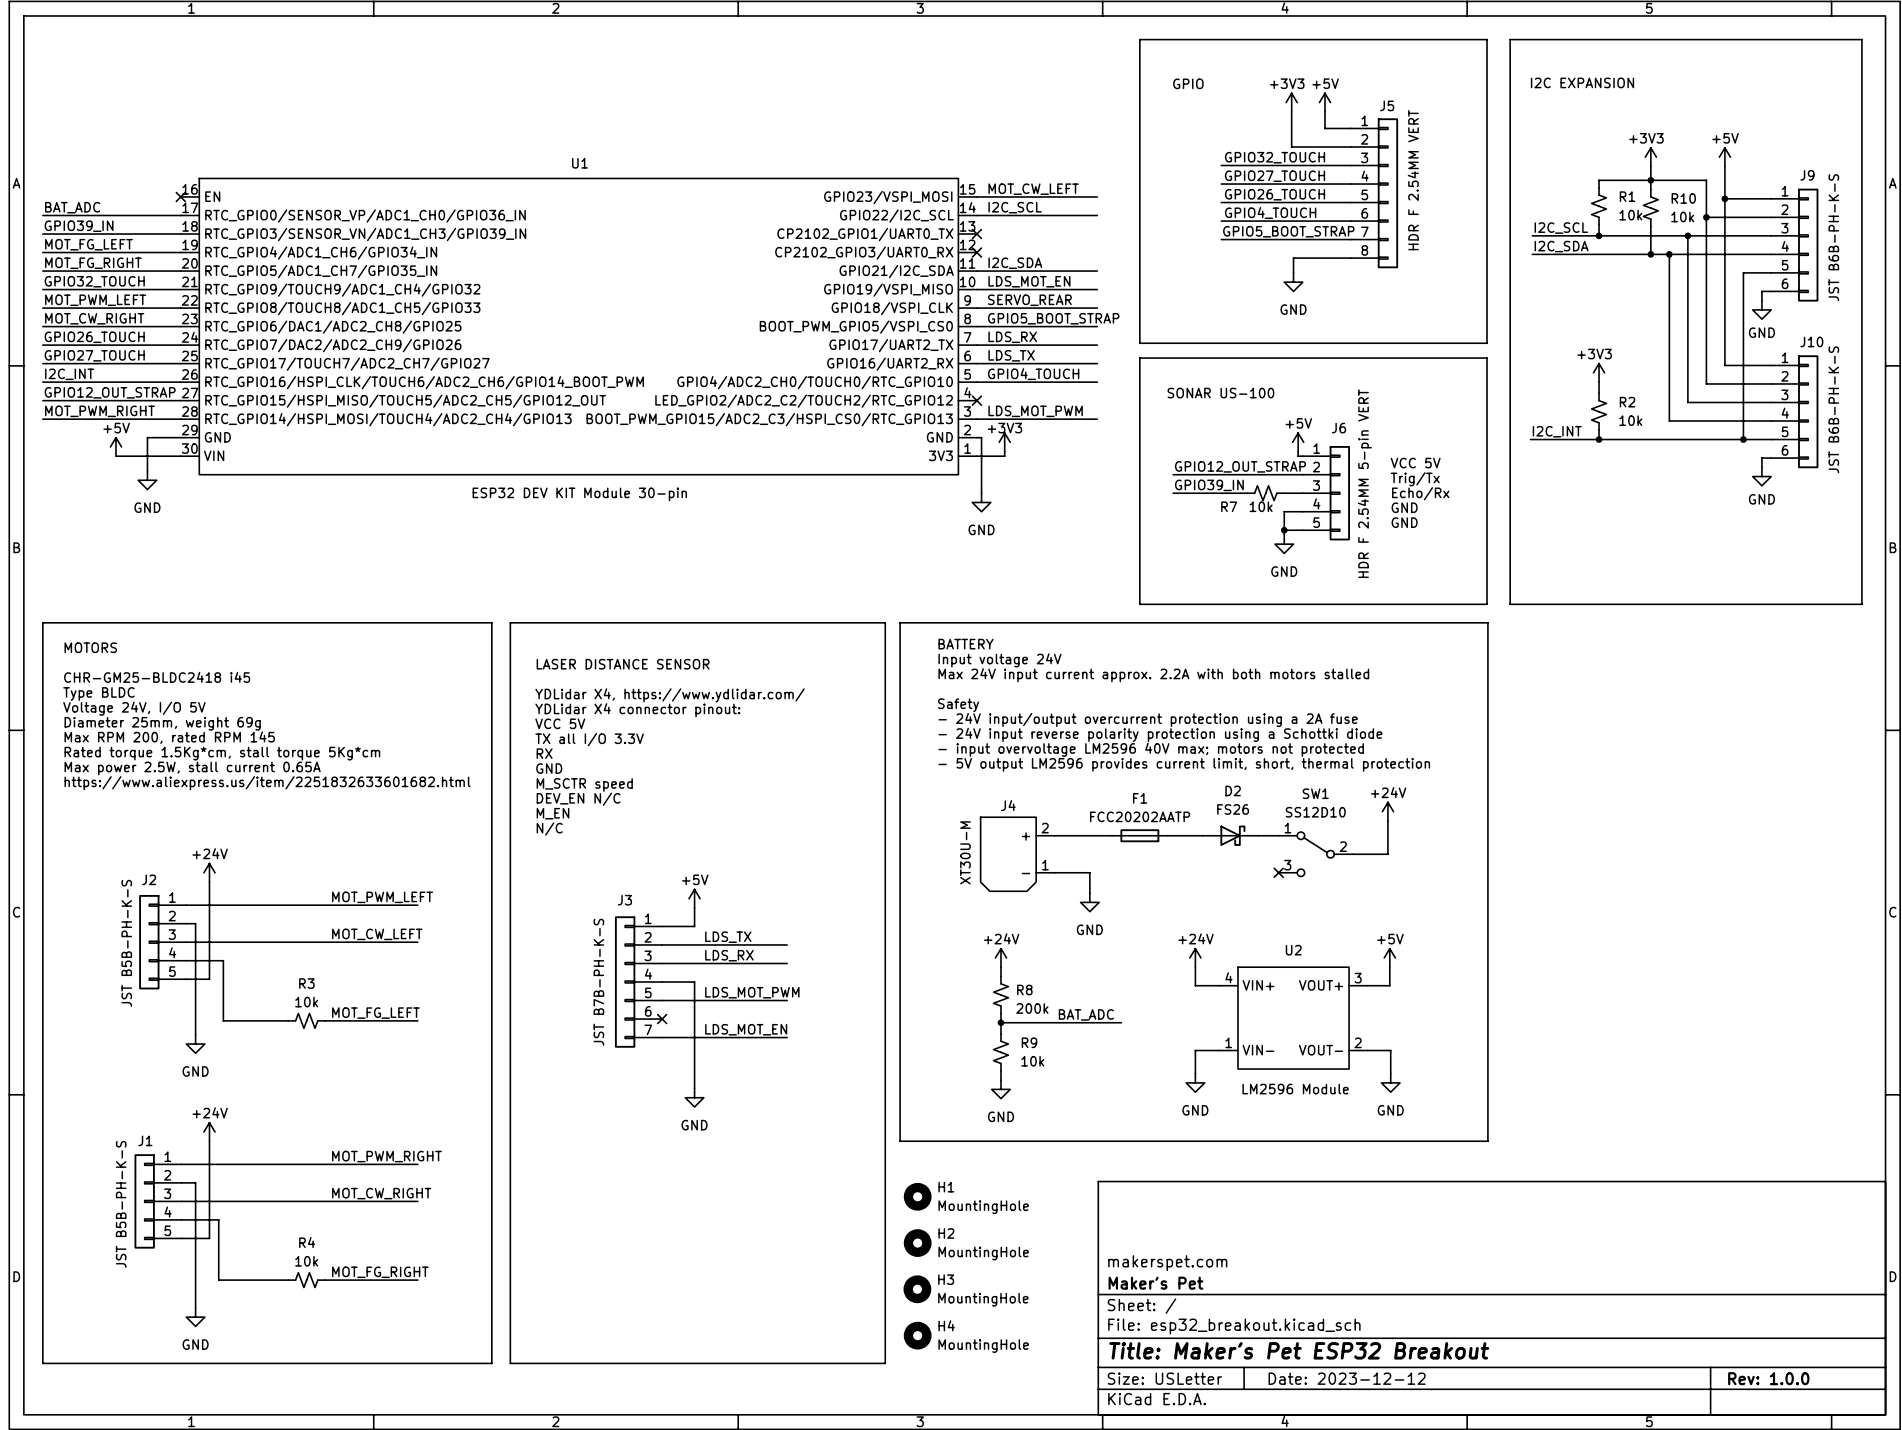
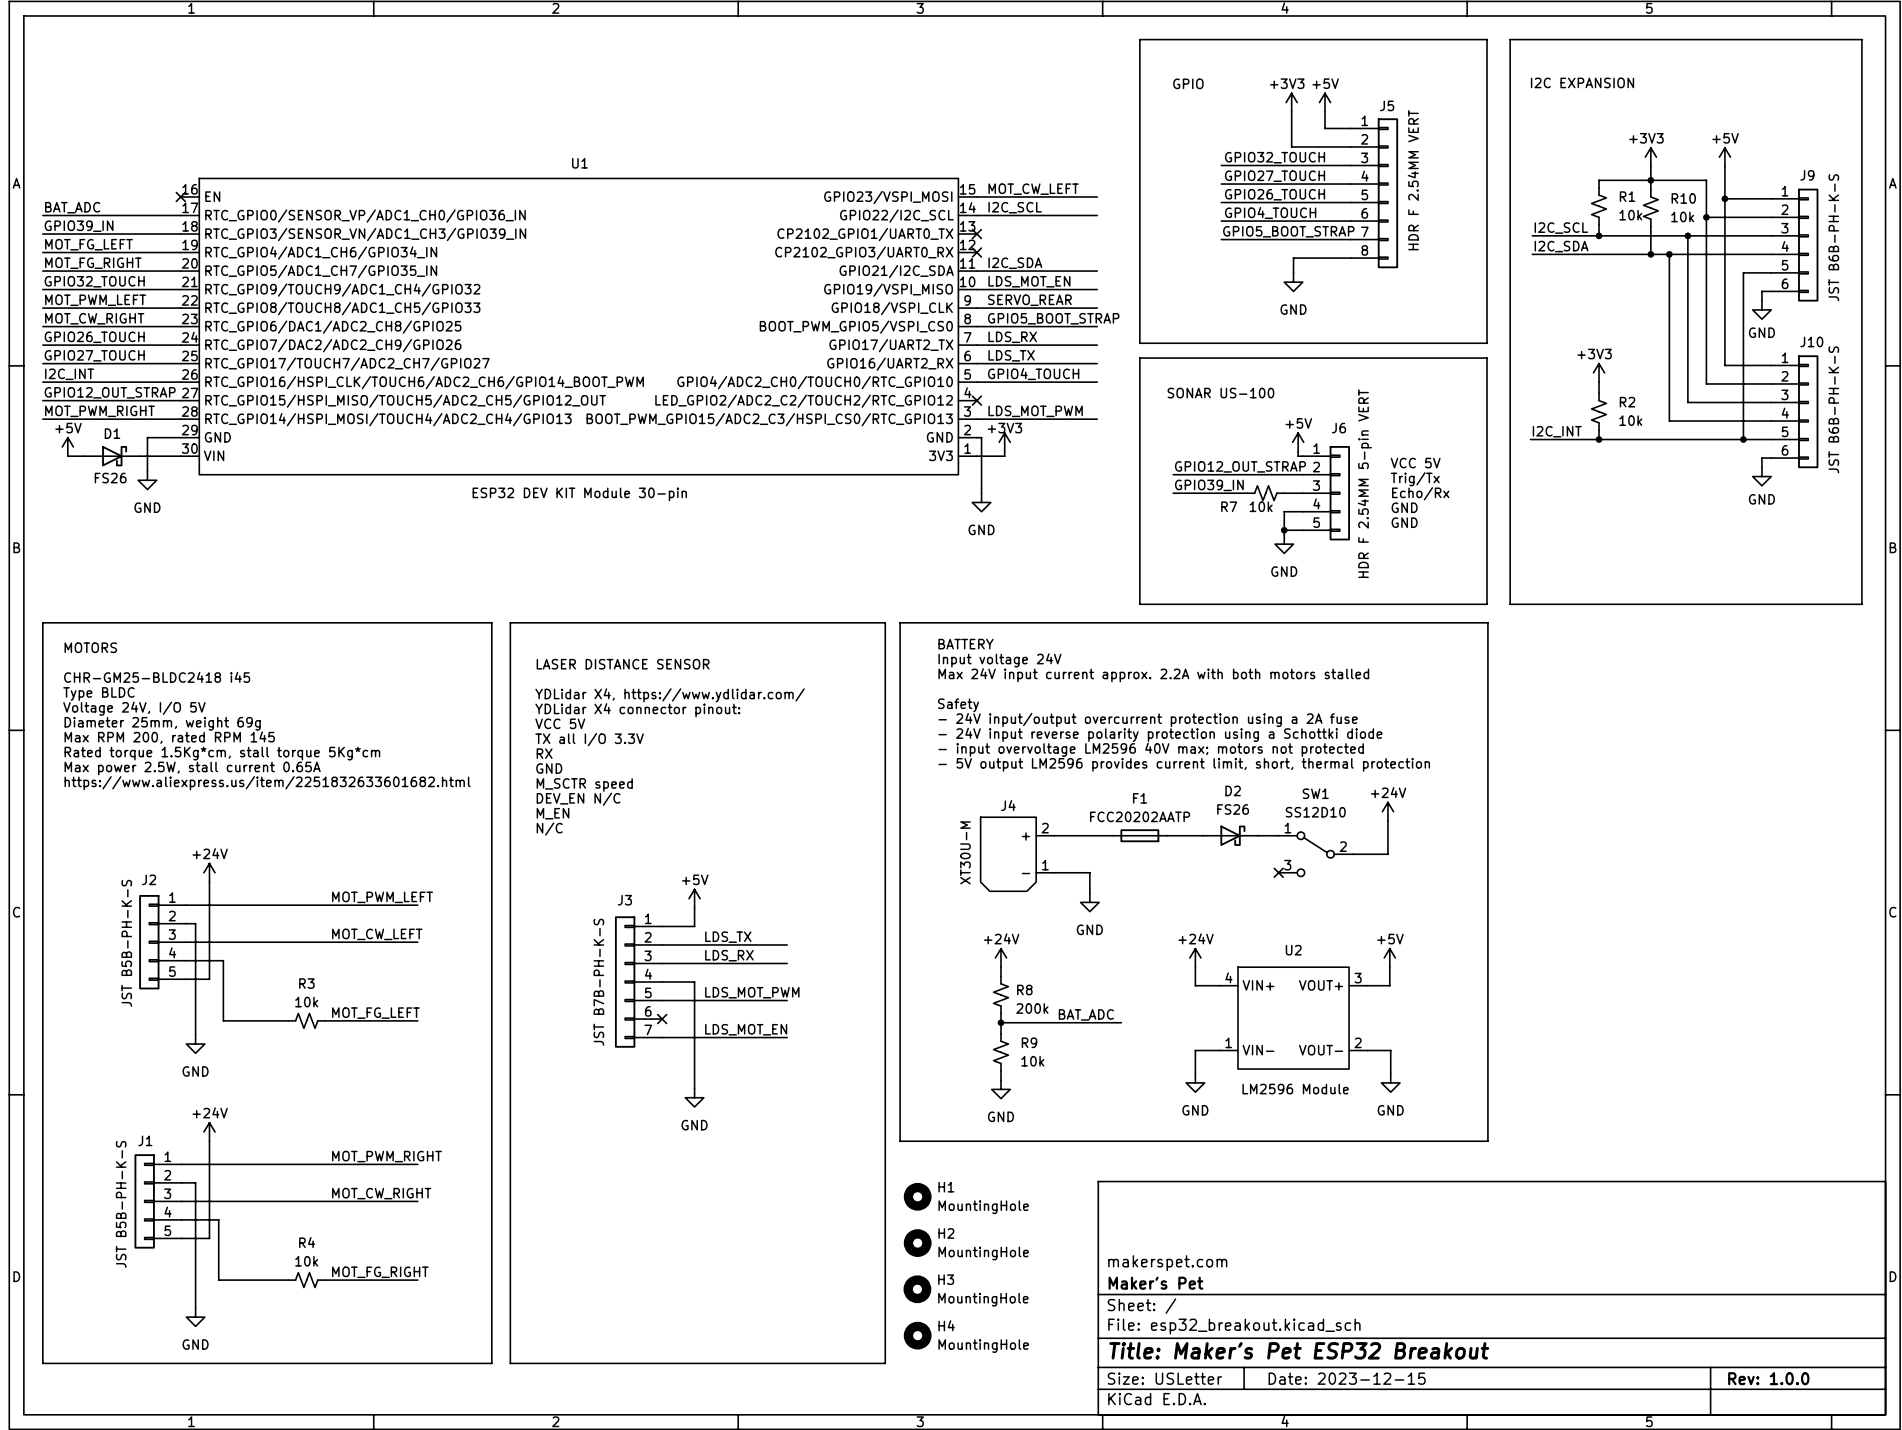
power symbol position: +5V (115, 446) -> +5V (67, 446)
wire: none -> (67, 456) (84, 456)
D1: none -> FS26 (112, 456)
title block: Date: 2023-12-12 (1347, 1378) -> Date: 2023-12-15 (1347, 1378)

